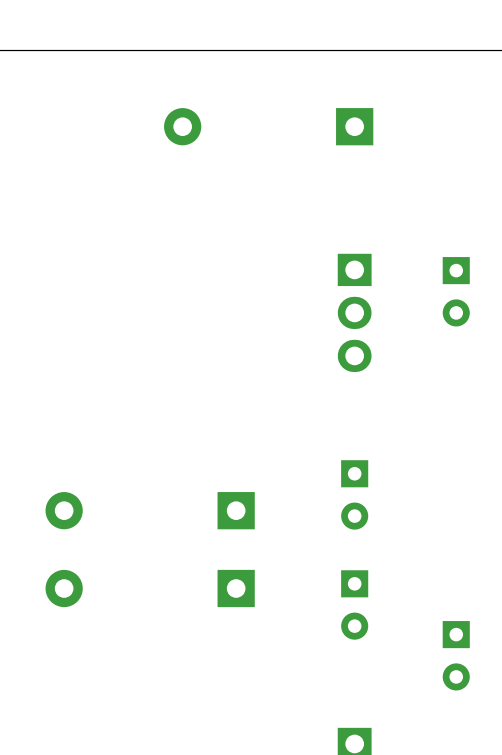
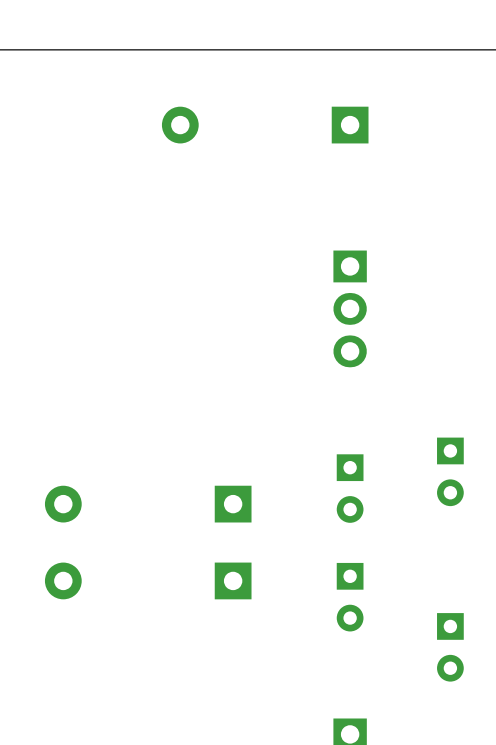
part position: (456, 291) -> (450, 471)

